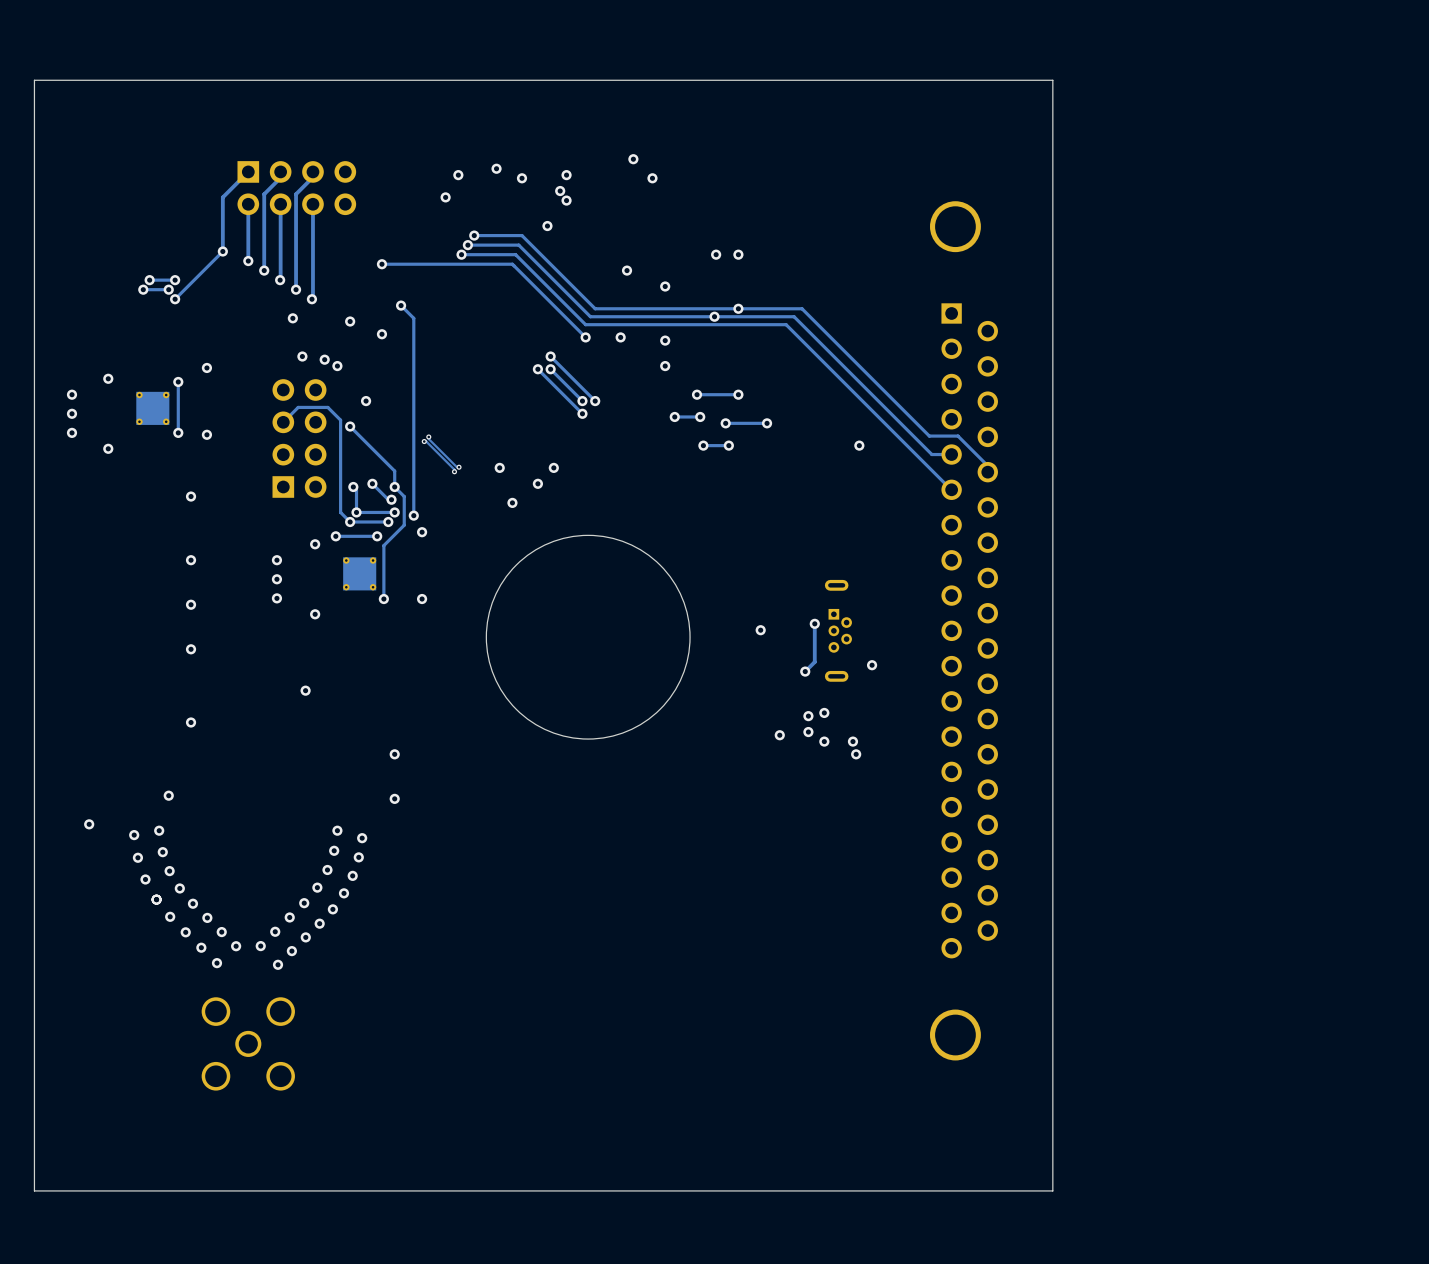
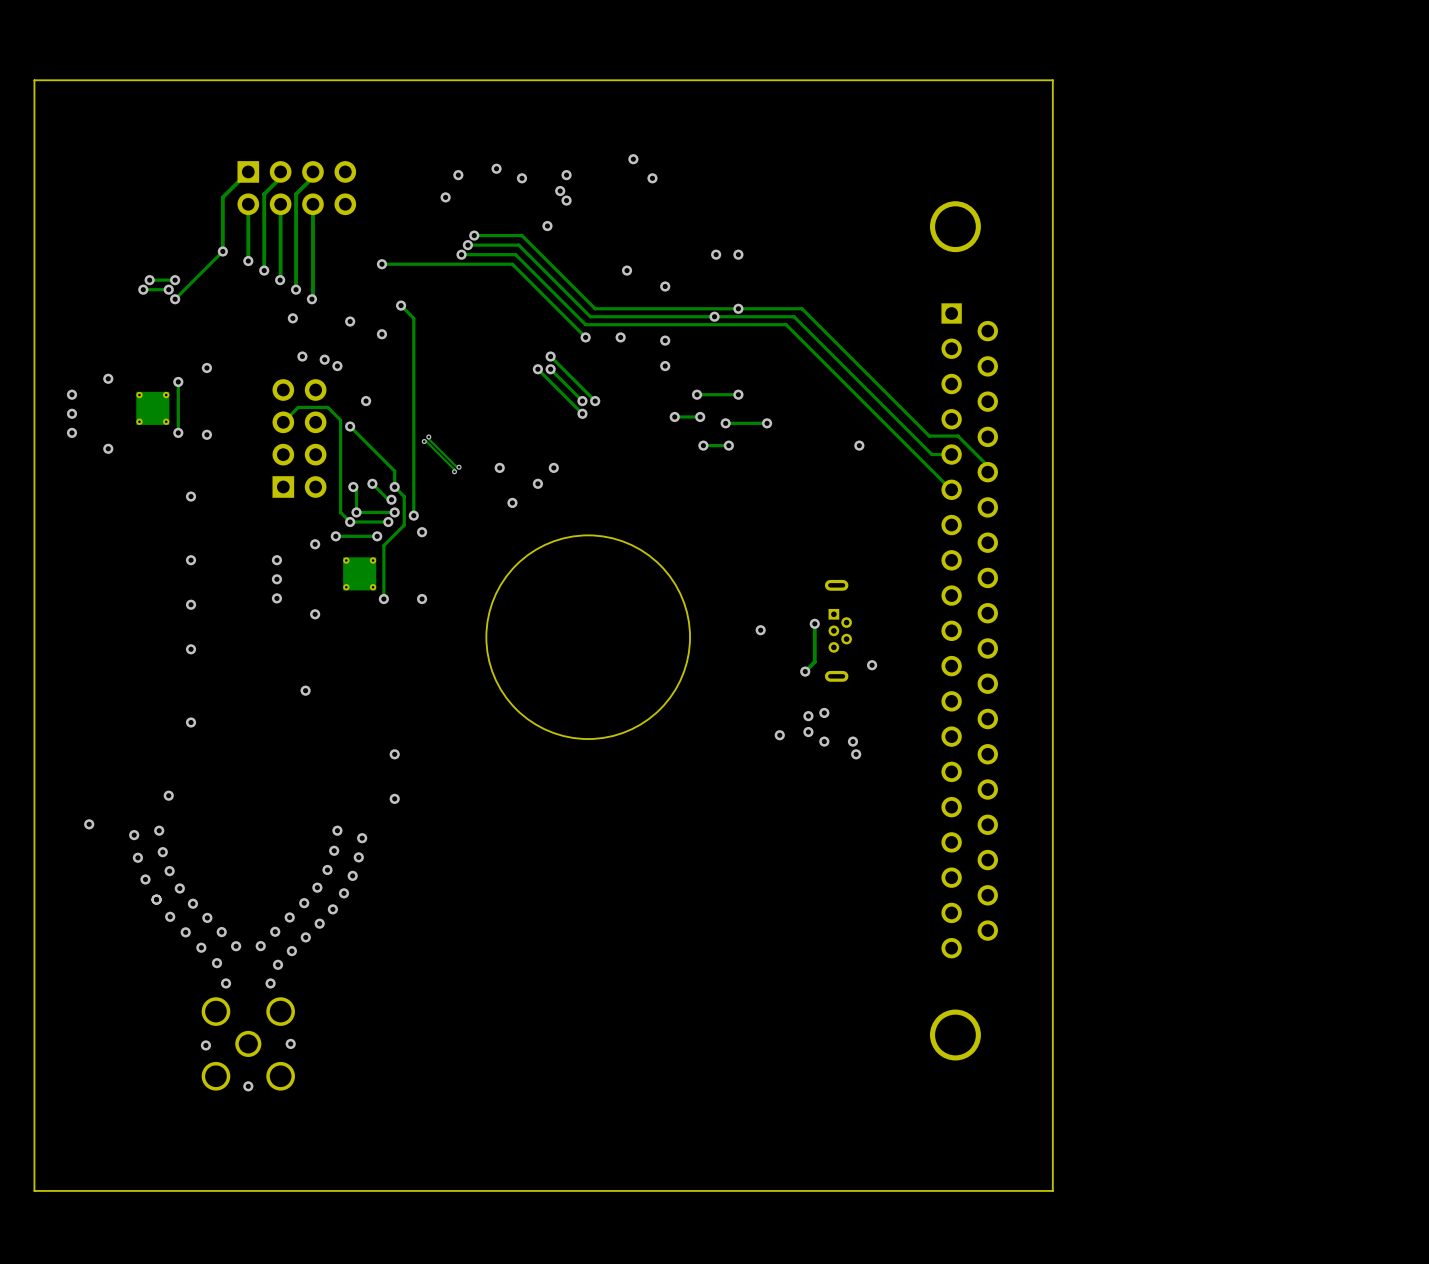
via: none -> (226, 983)
via: none -> (270, 983)
via: none -> (290, 1043)
via: none -> (205, 1045)
via: none -> (248, 1086)

